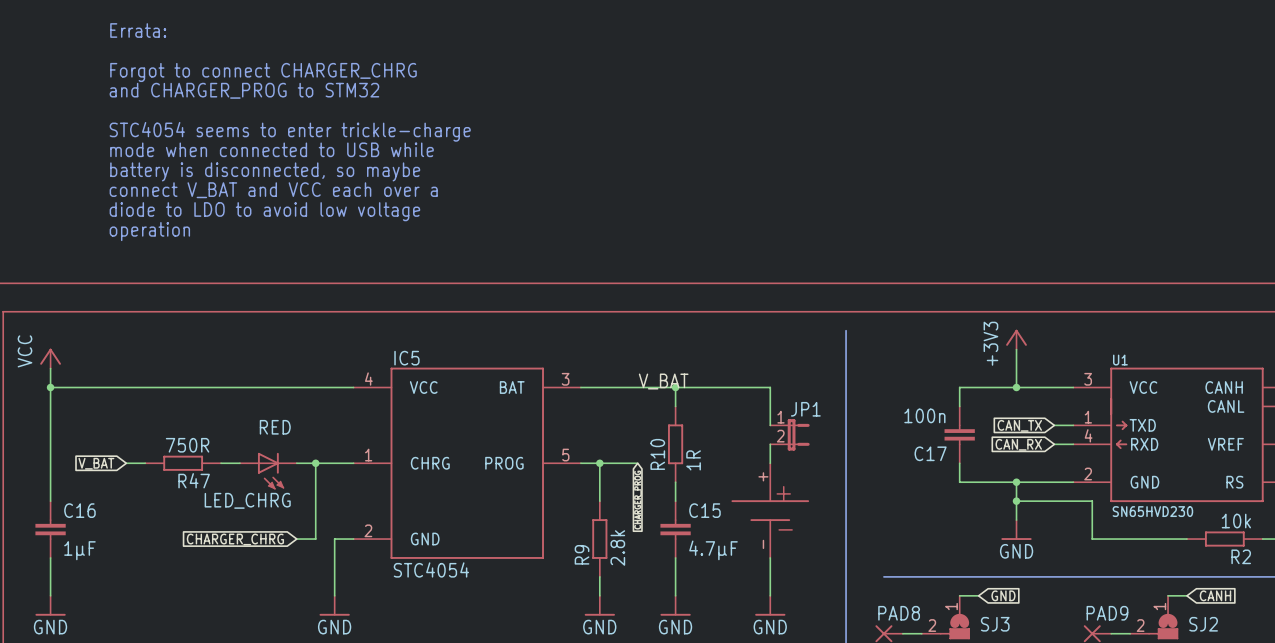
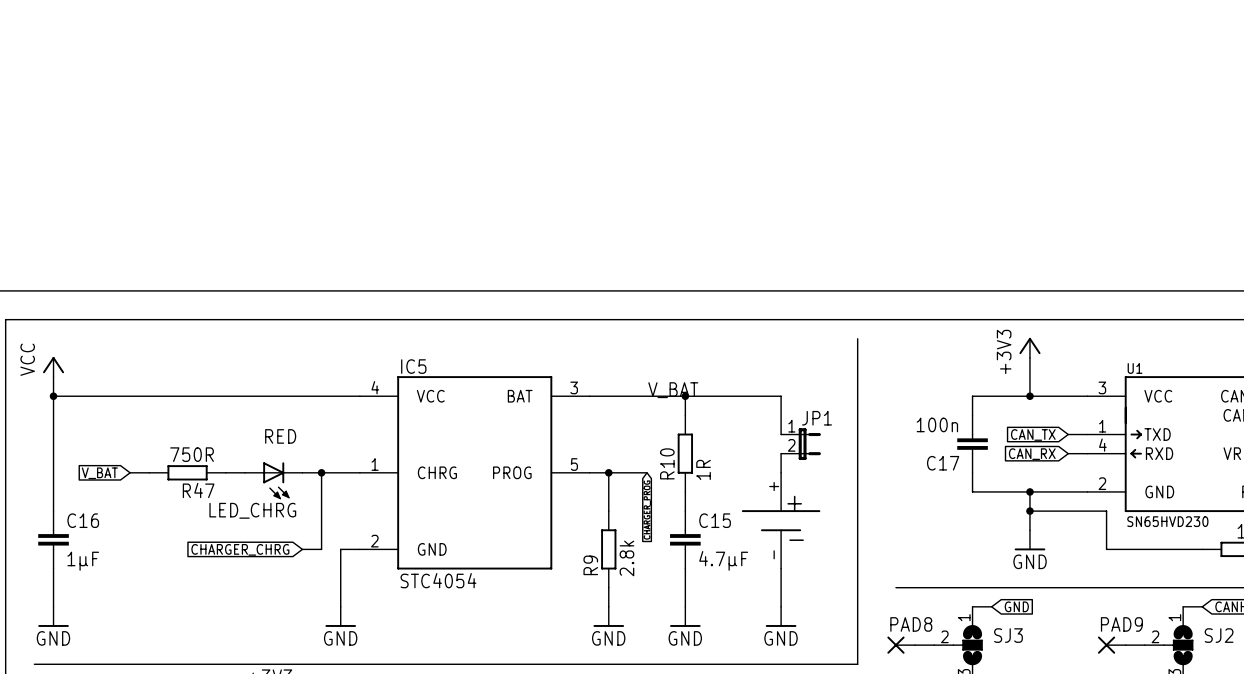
text: Errata: (138, 30) -> none
text: Forgot to connect CHARGER_CHRG (263, 72) -> none
text: and CHARGER_PROG to STM32 (244, 90) -> none
text: STC4054 seems to enter trickle-charge (290, 131) -> none
text: mode when connected to USB while (272, 149) -> none
text: battery is disconnected, so maybe (265, 171) -> none
text: connect V_BAT and VCC each over a (273, 190) -> none
text: diode to LDO to avoid low voltage (264, 211) -> none
text: operation (149, 231) -> none

